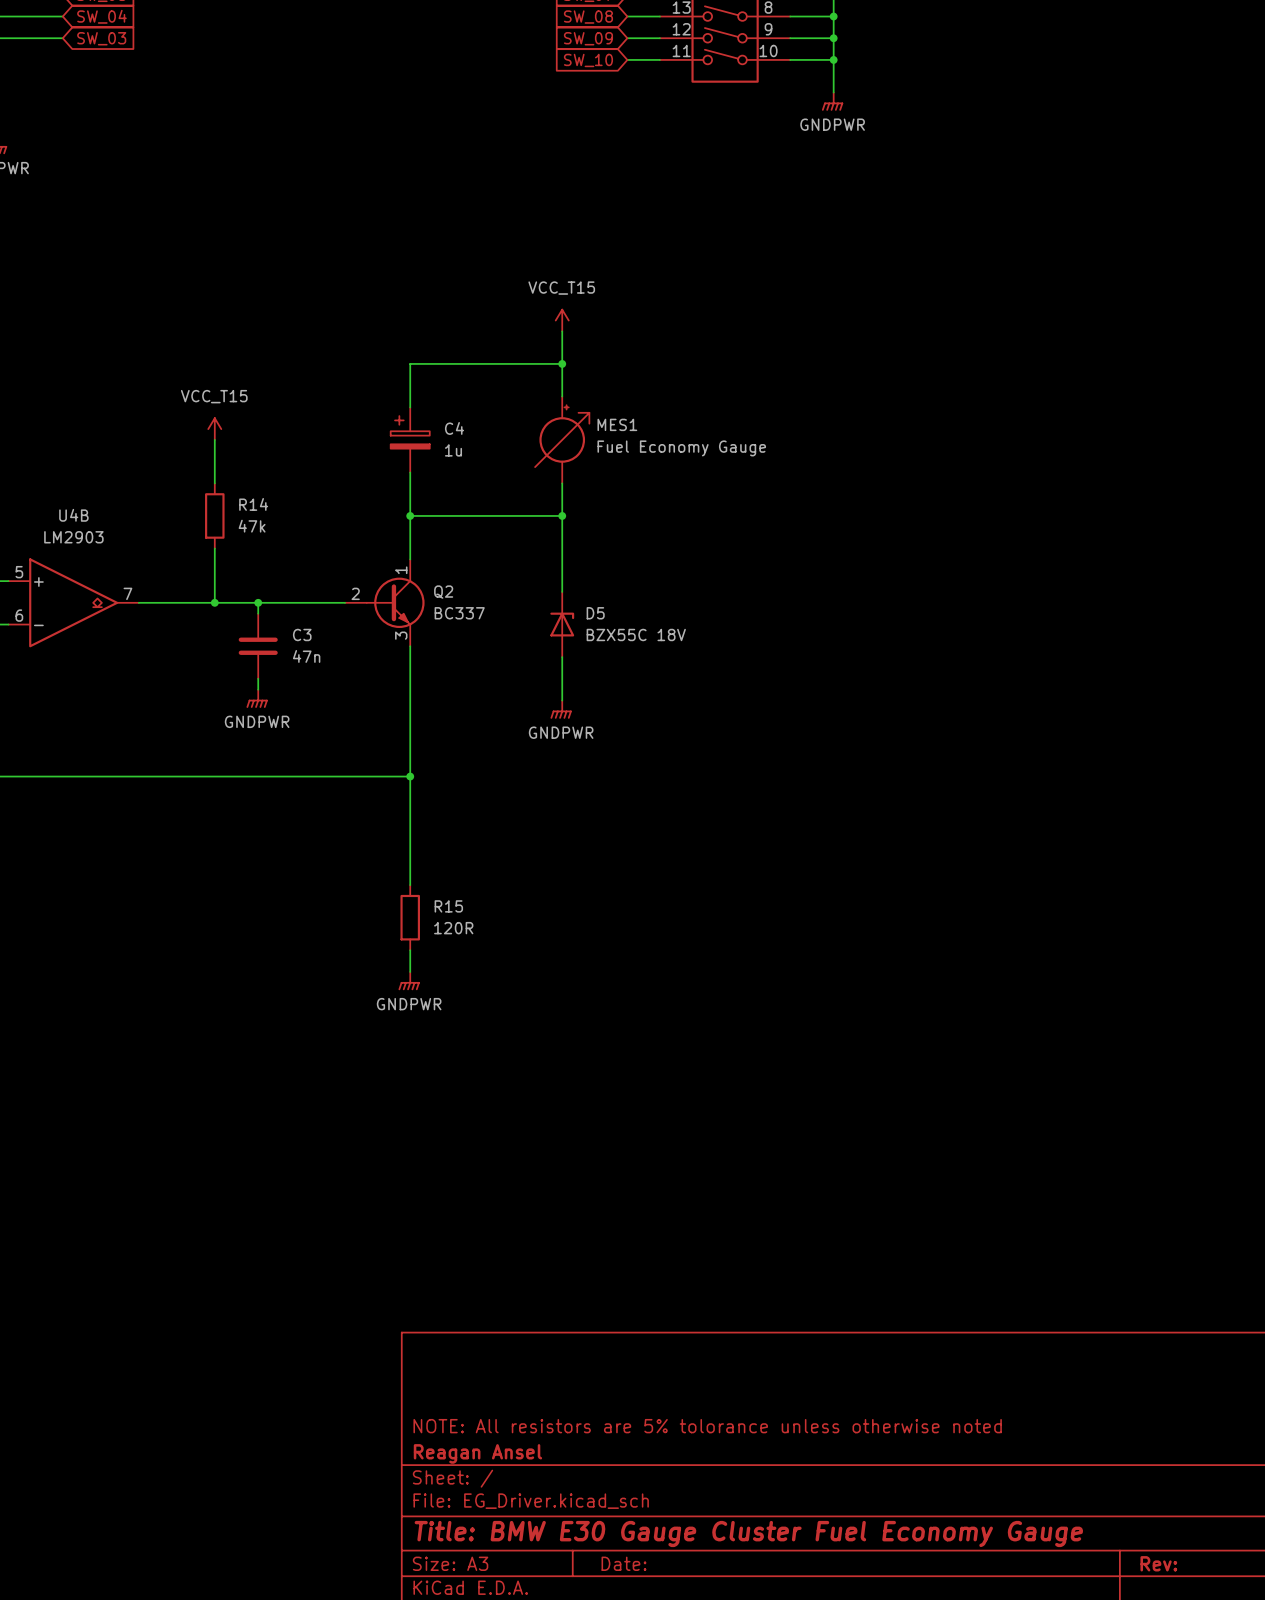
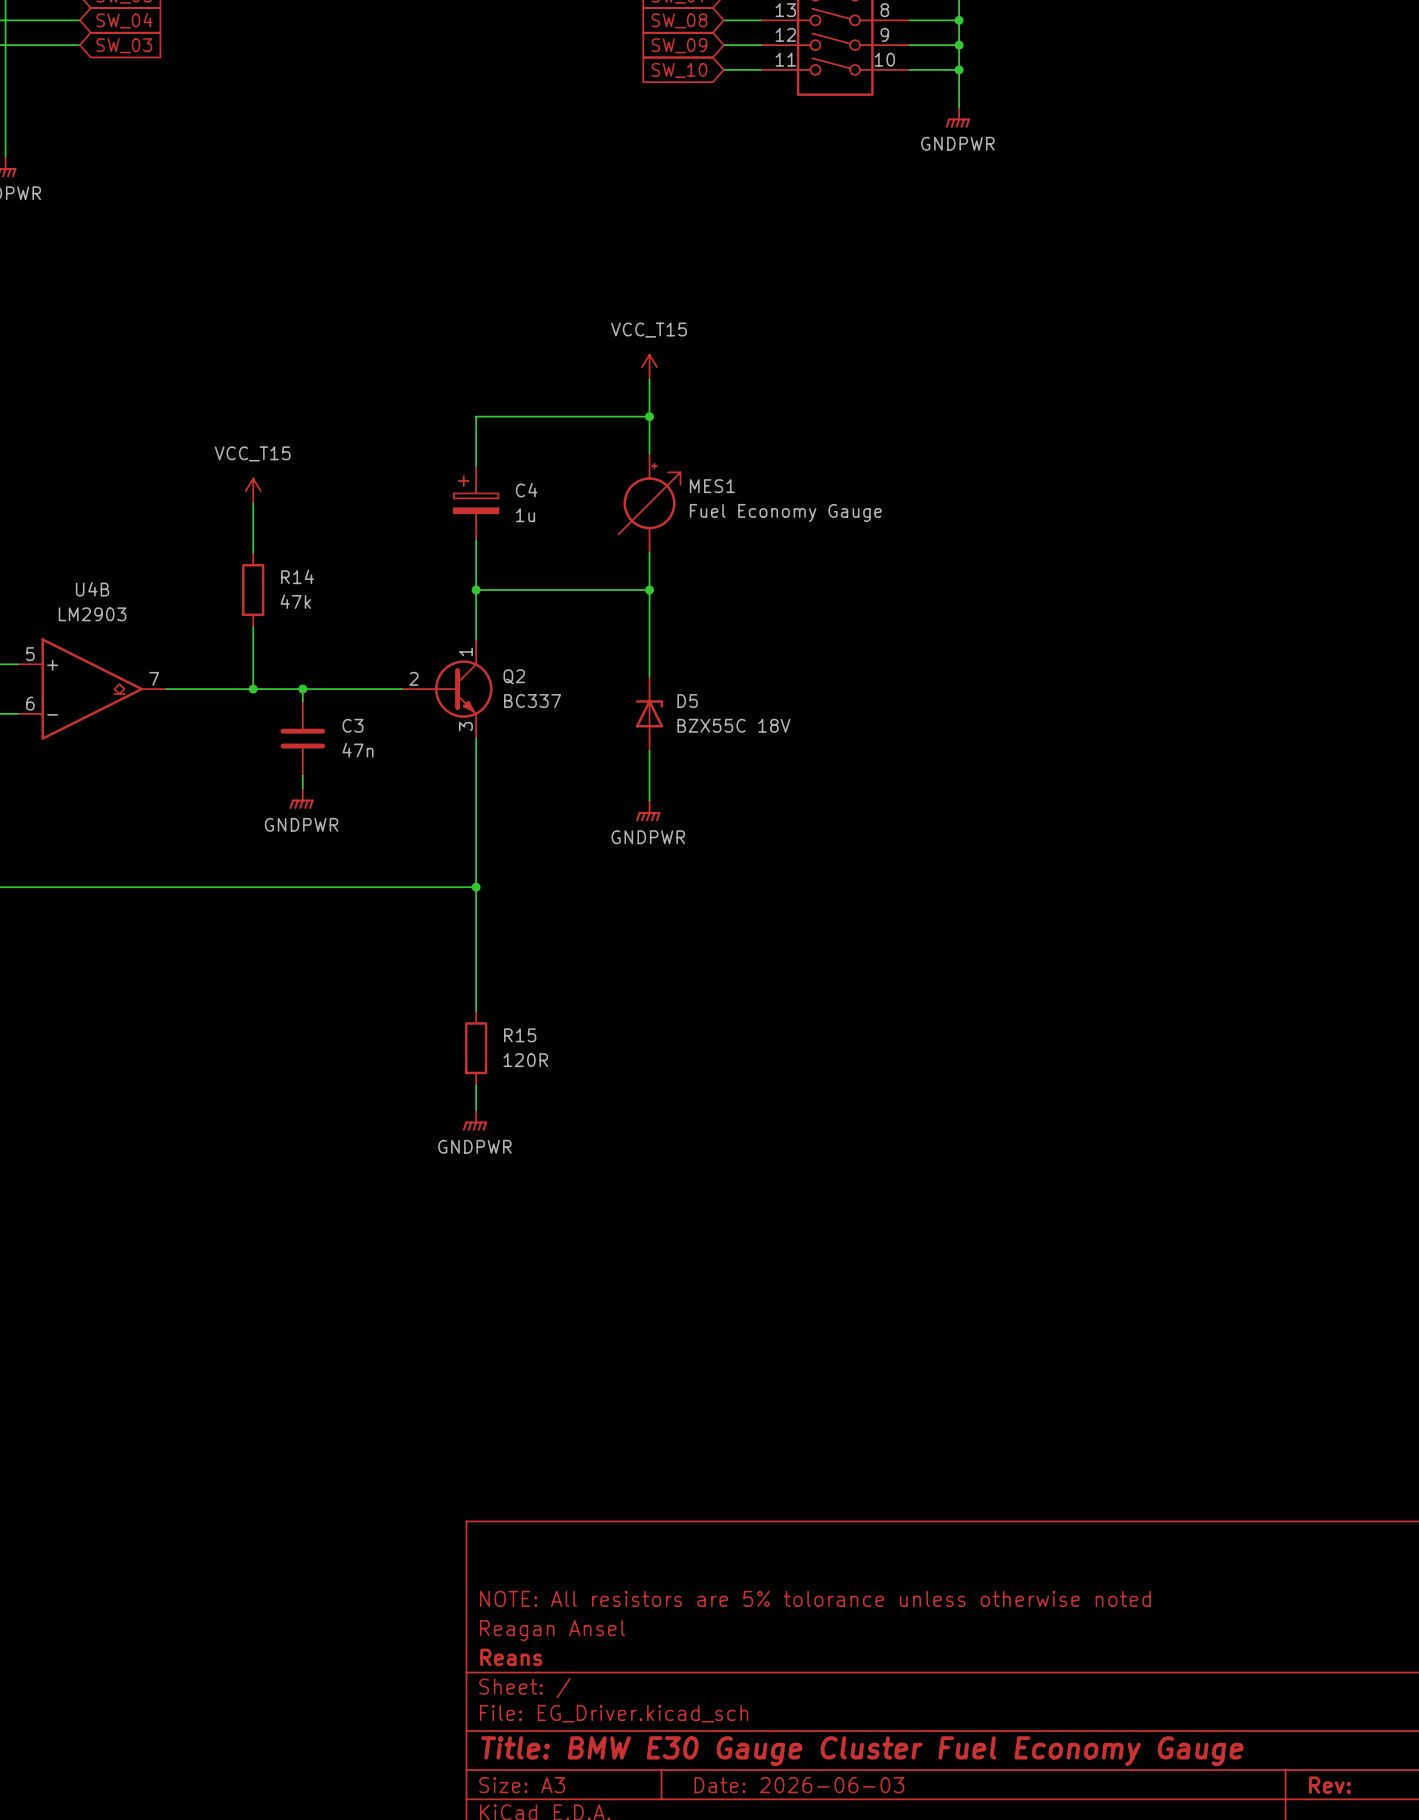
title block: none -> NOTE: All resistors are 5% tolorance unless otherwise noted (815, 1598)
title block: NOTE: All resistors are 5% tolorance unless otherwise noted (707, 1426) -> Reagan Ansel (552, 1630)
title block: Reagan Ansel (477, 1453) -> Reans (511, 1657)
title block: Date: (623, 1563) -> Date: 2026-06-03 (799, 1785)

